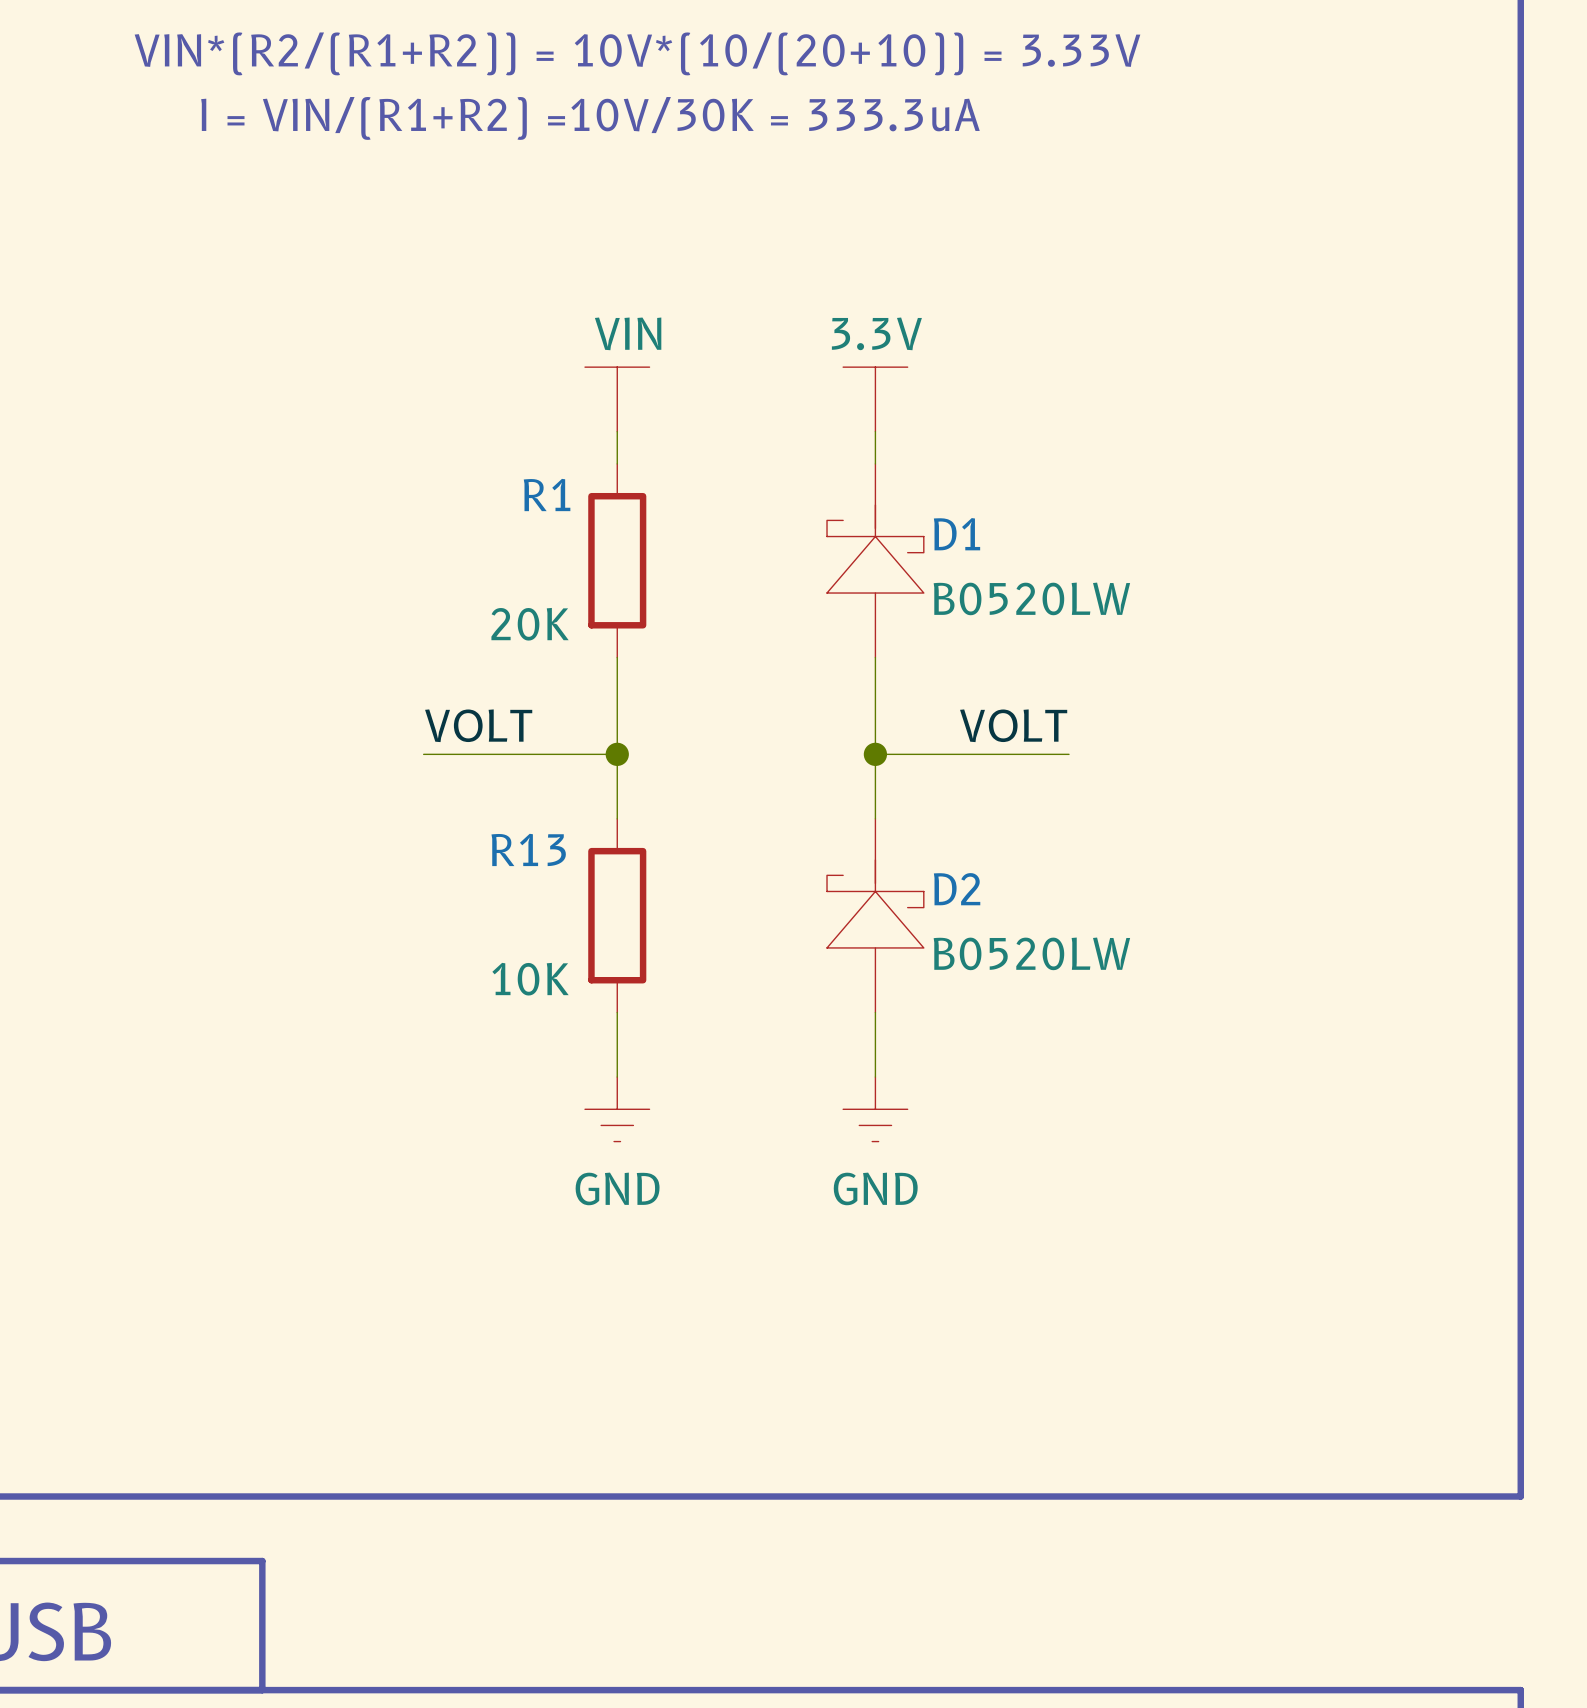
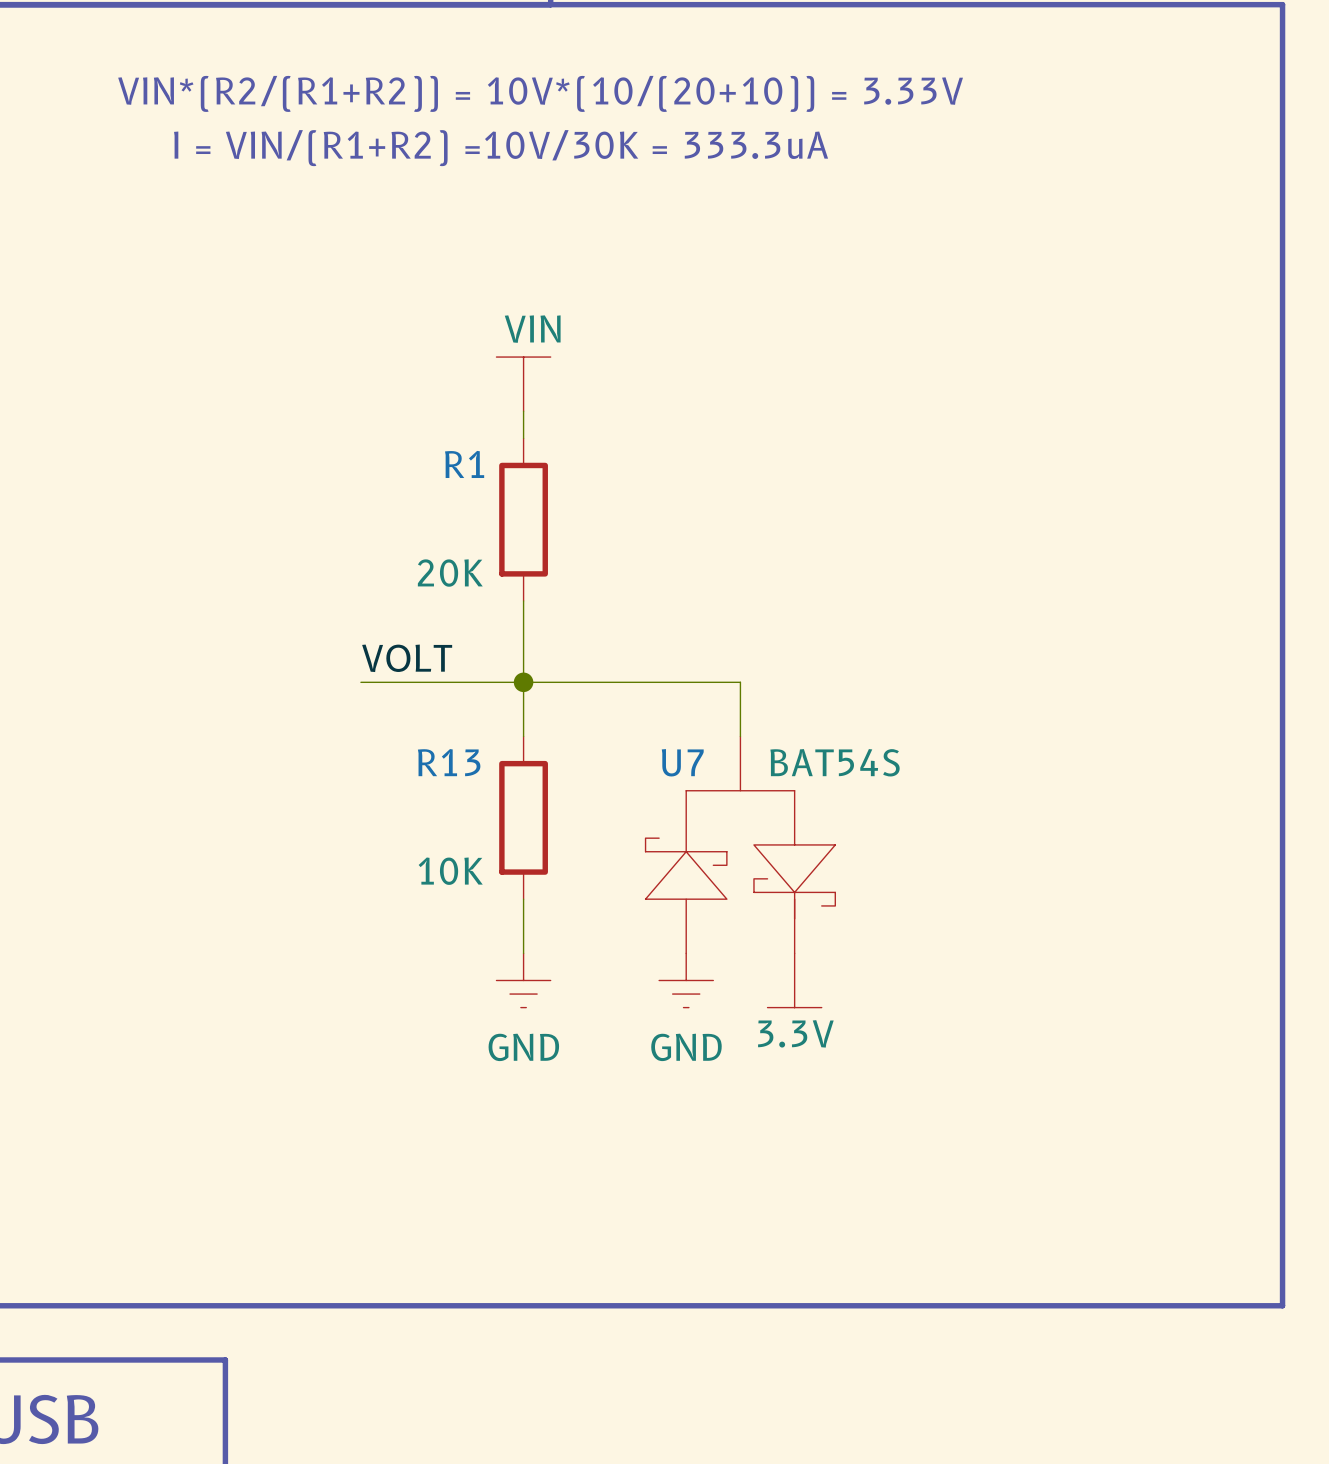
power symbol: 3.3V (875, 399) -> none
wire: (875, 431) (875, 463) -> none
D1: B0520LW (875, 560) -> none
wire: (875, 657) (875, 754) (1069, 754) -> none
label: VOLT (1013, 725) -> none
wire: none -> (523, 682) (740, 682)
junction: (875, 754) -> none
D2: B0520LW (875, 915) -> none
U7: none -> BAT54S (740, 844)
wire: (875, 1012) (875, 1077) -> none
power symbol position: GND (875, 1109) -> GND (686, 980)
power symbol: none -> 3.3V (794, 980)

